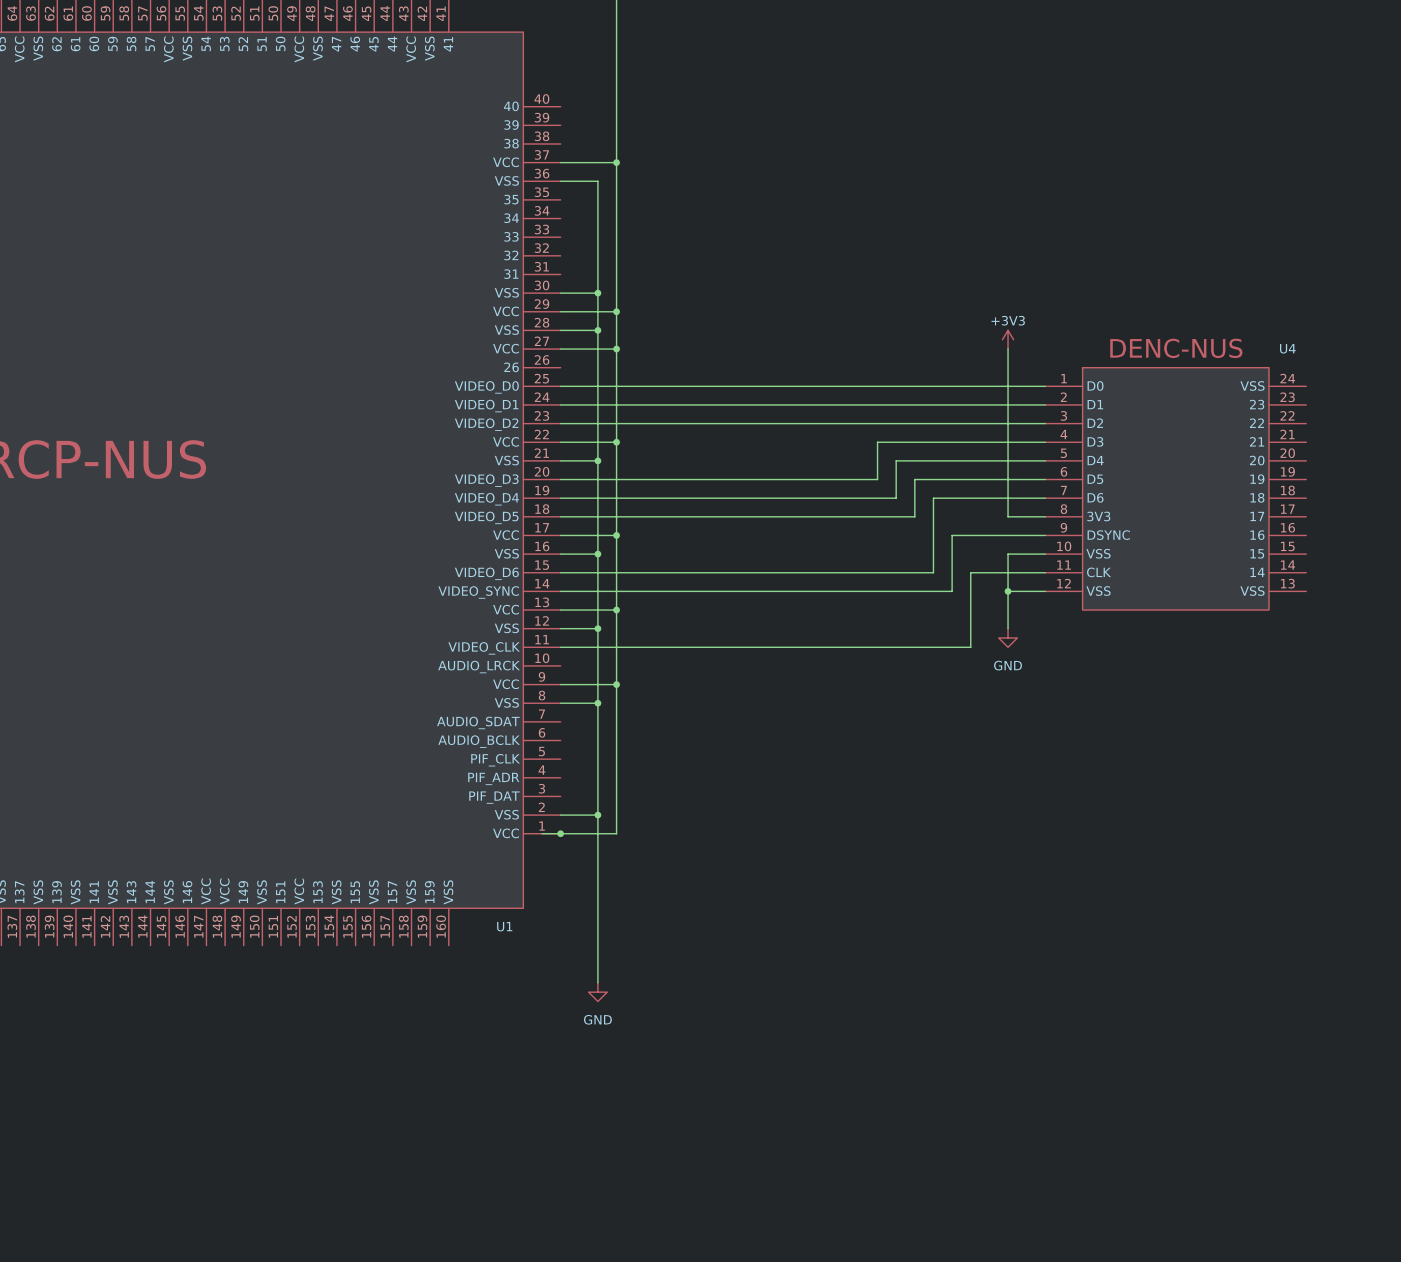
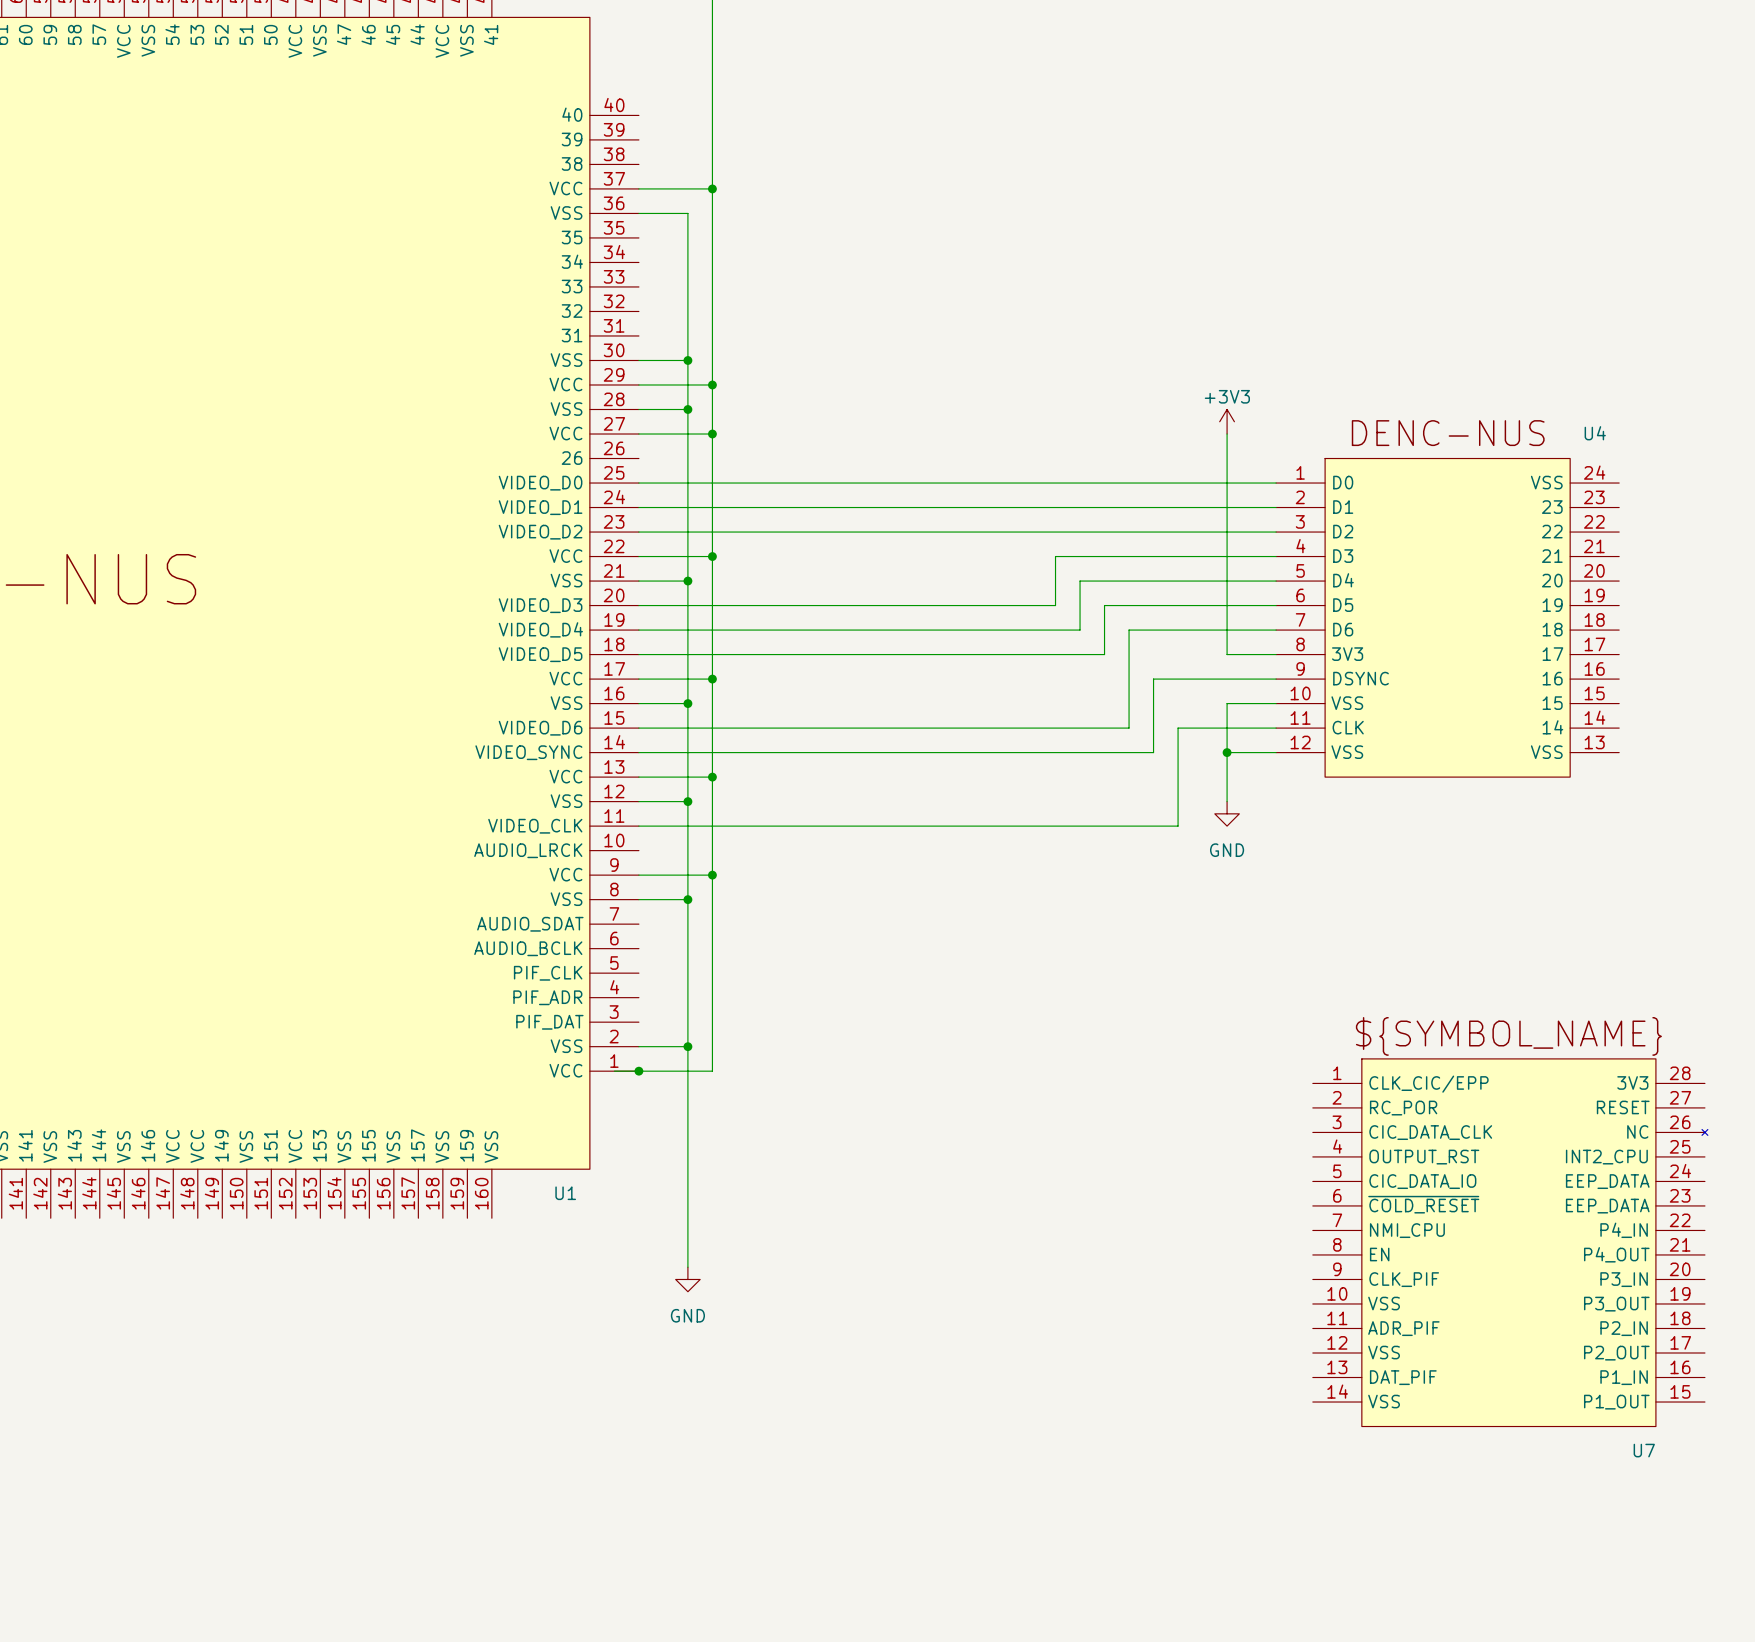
U7: none -> (1510, 1242)

